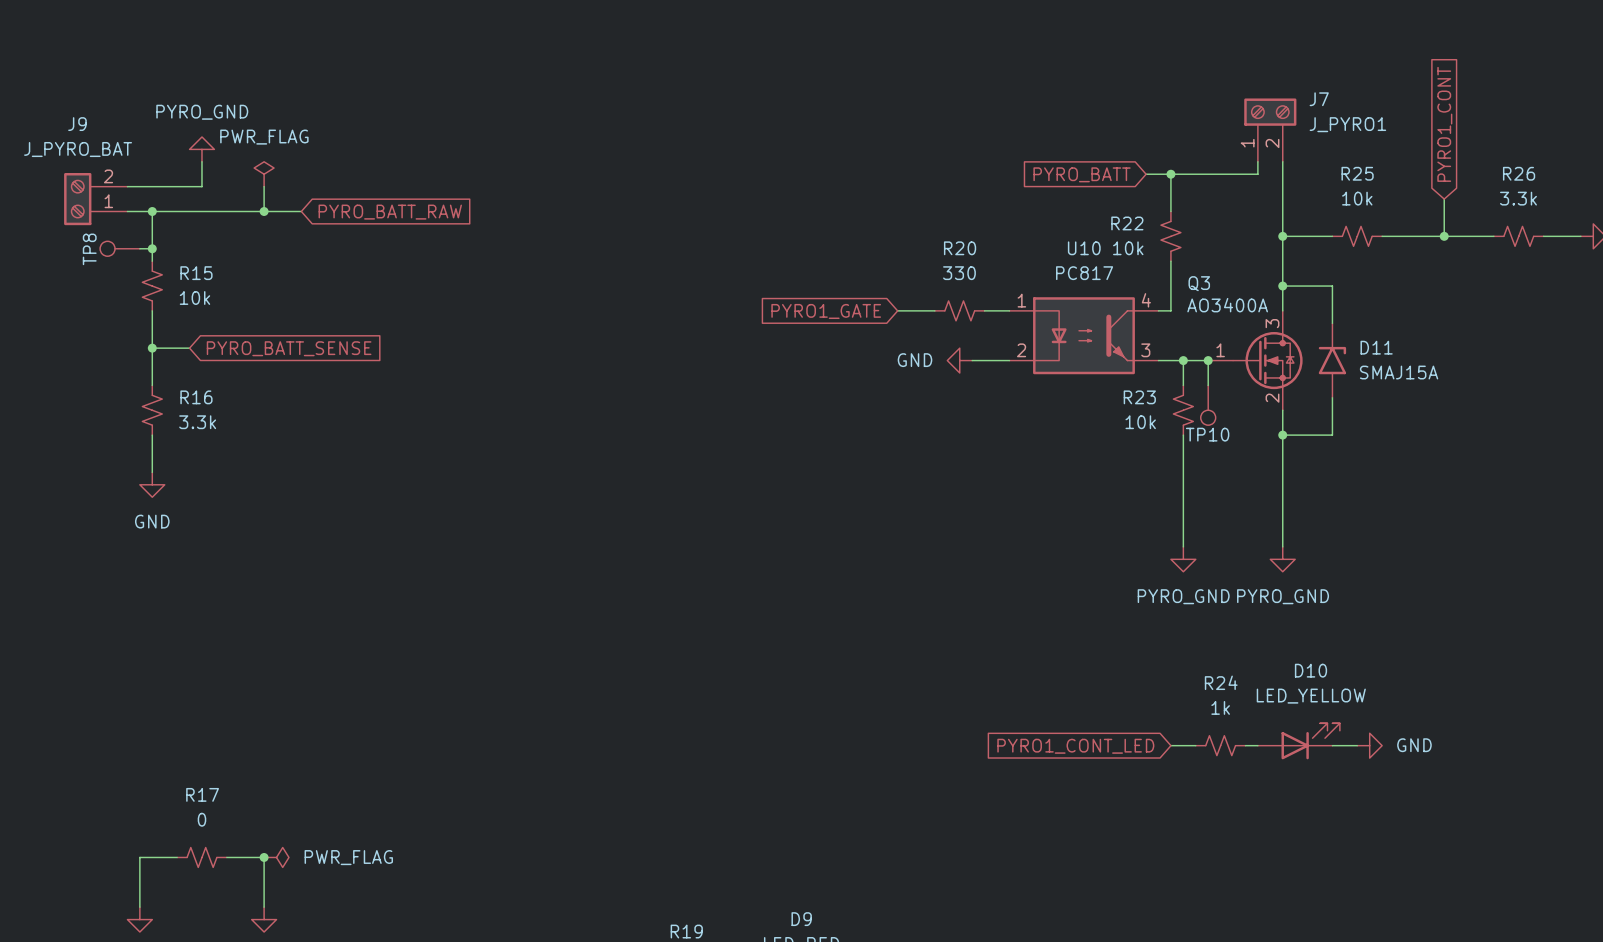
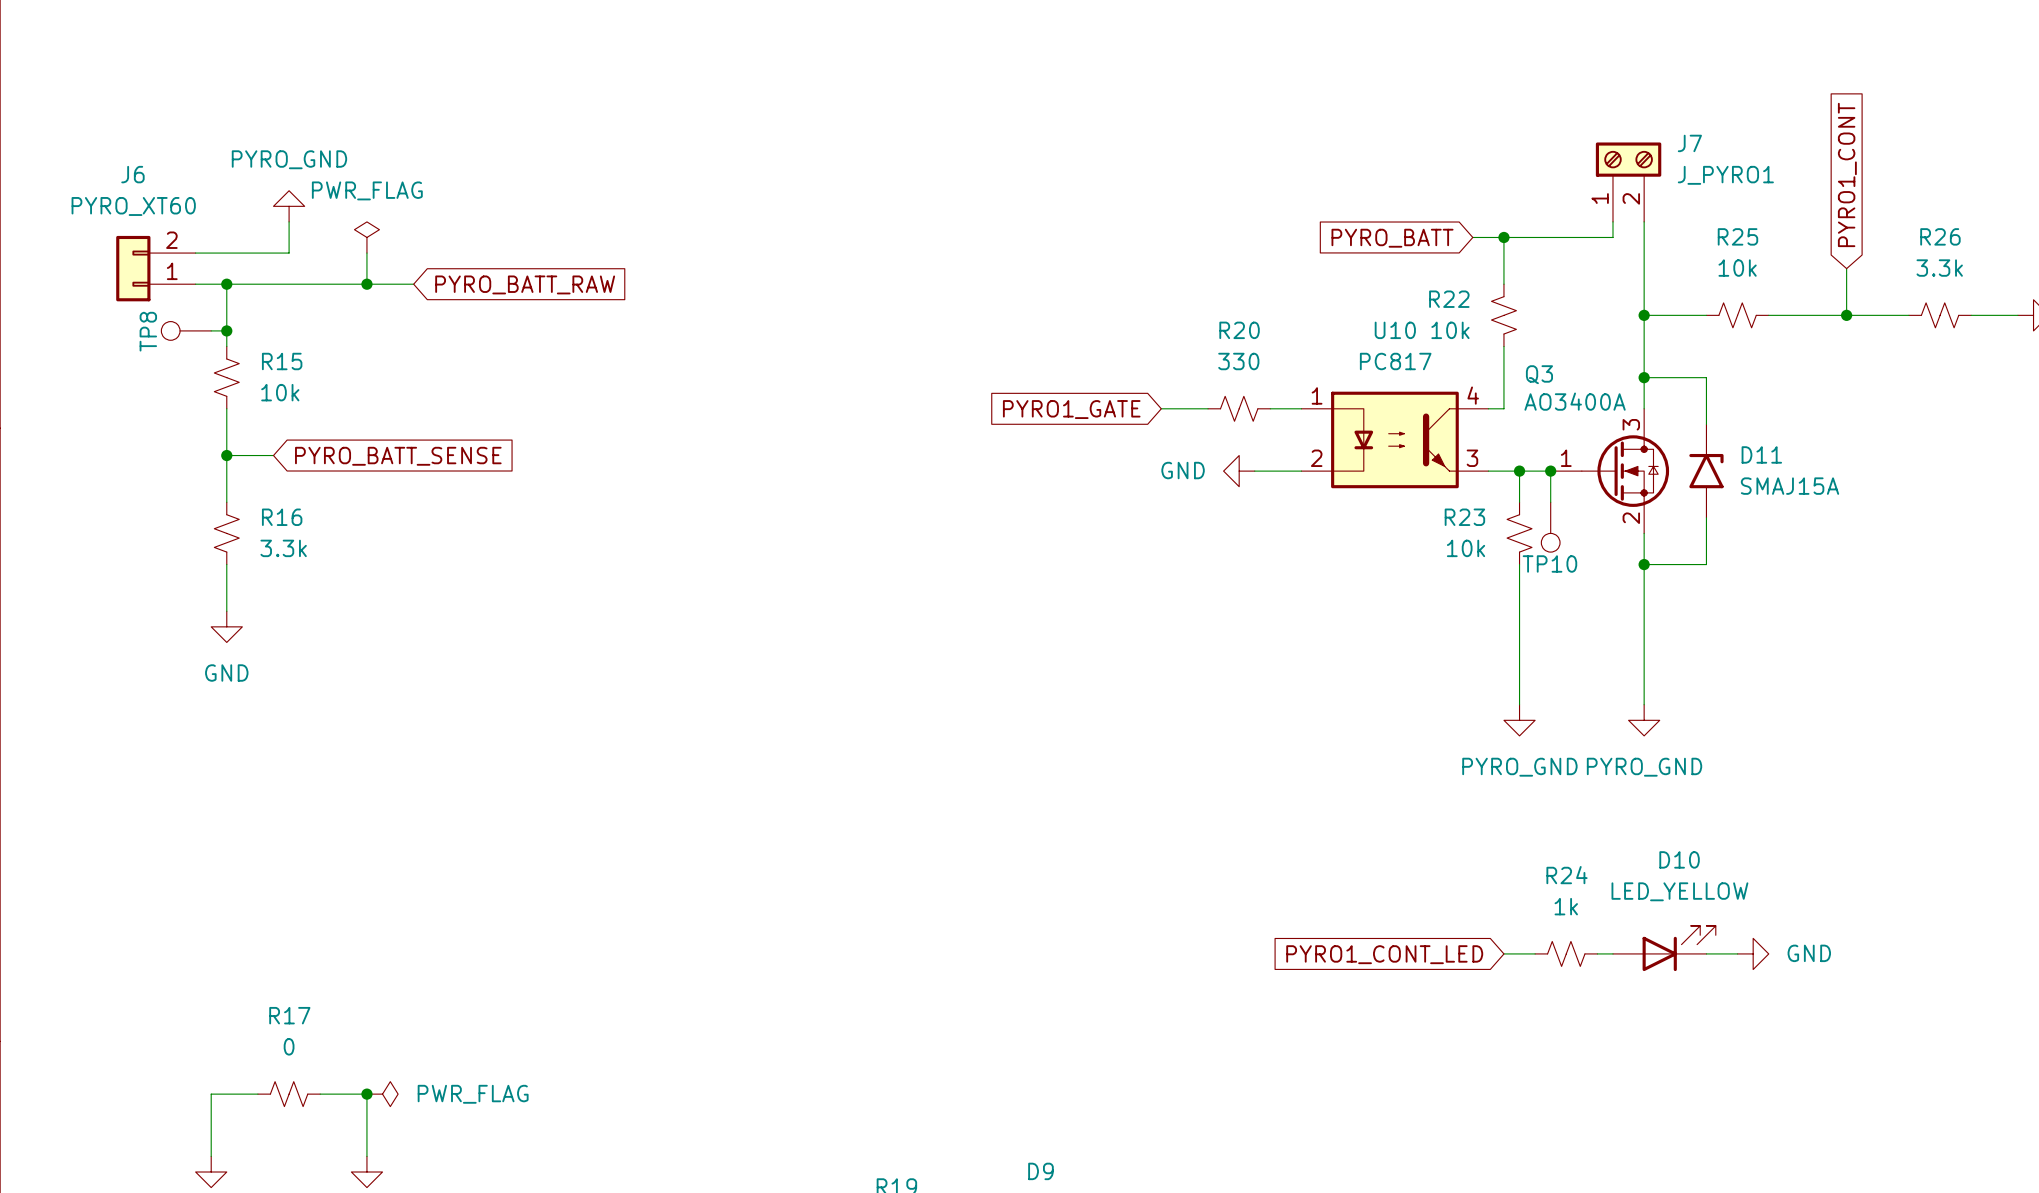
J9: J_PYRO_BAT (95, 199) -> none
J6: none -> PYRO_XT60 (155, 268)

